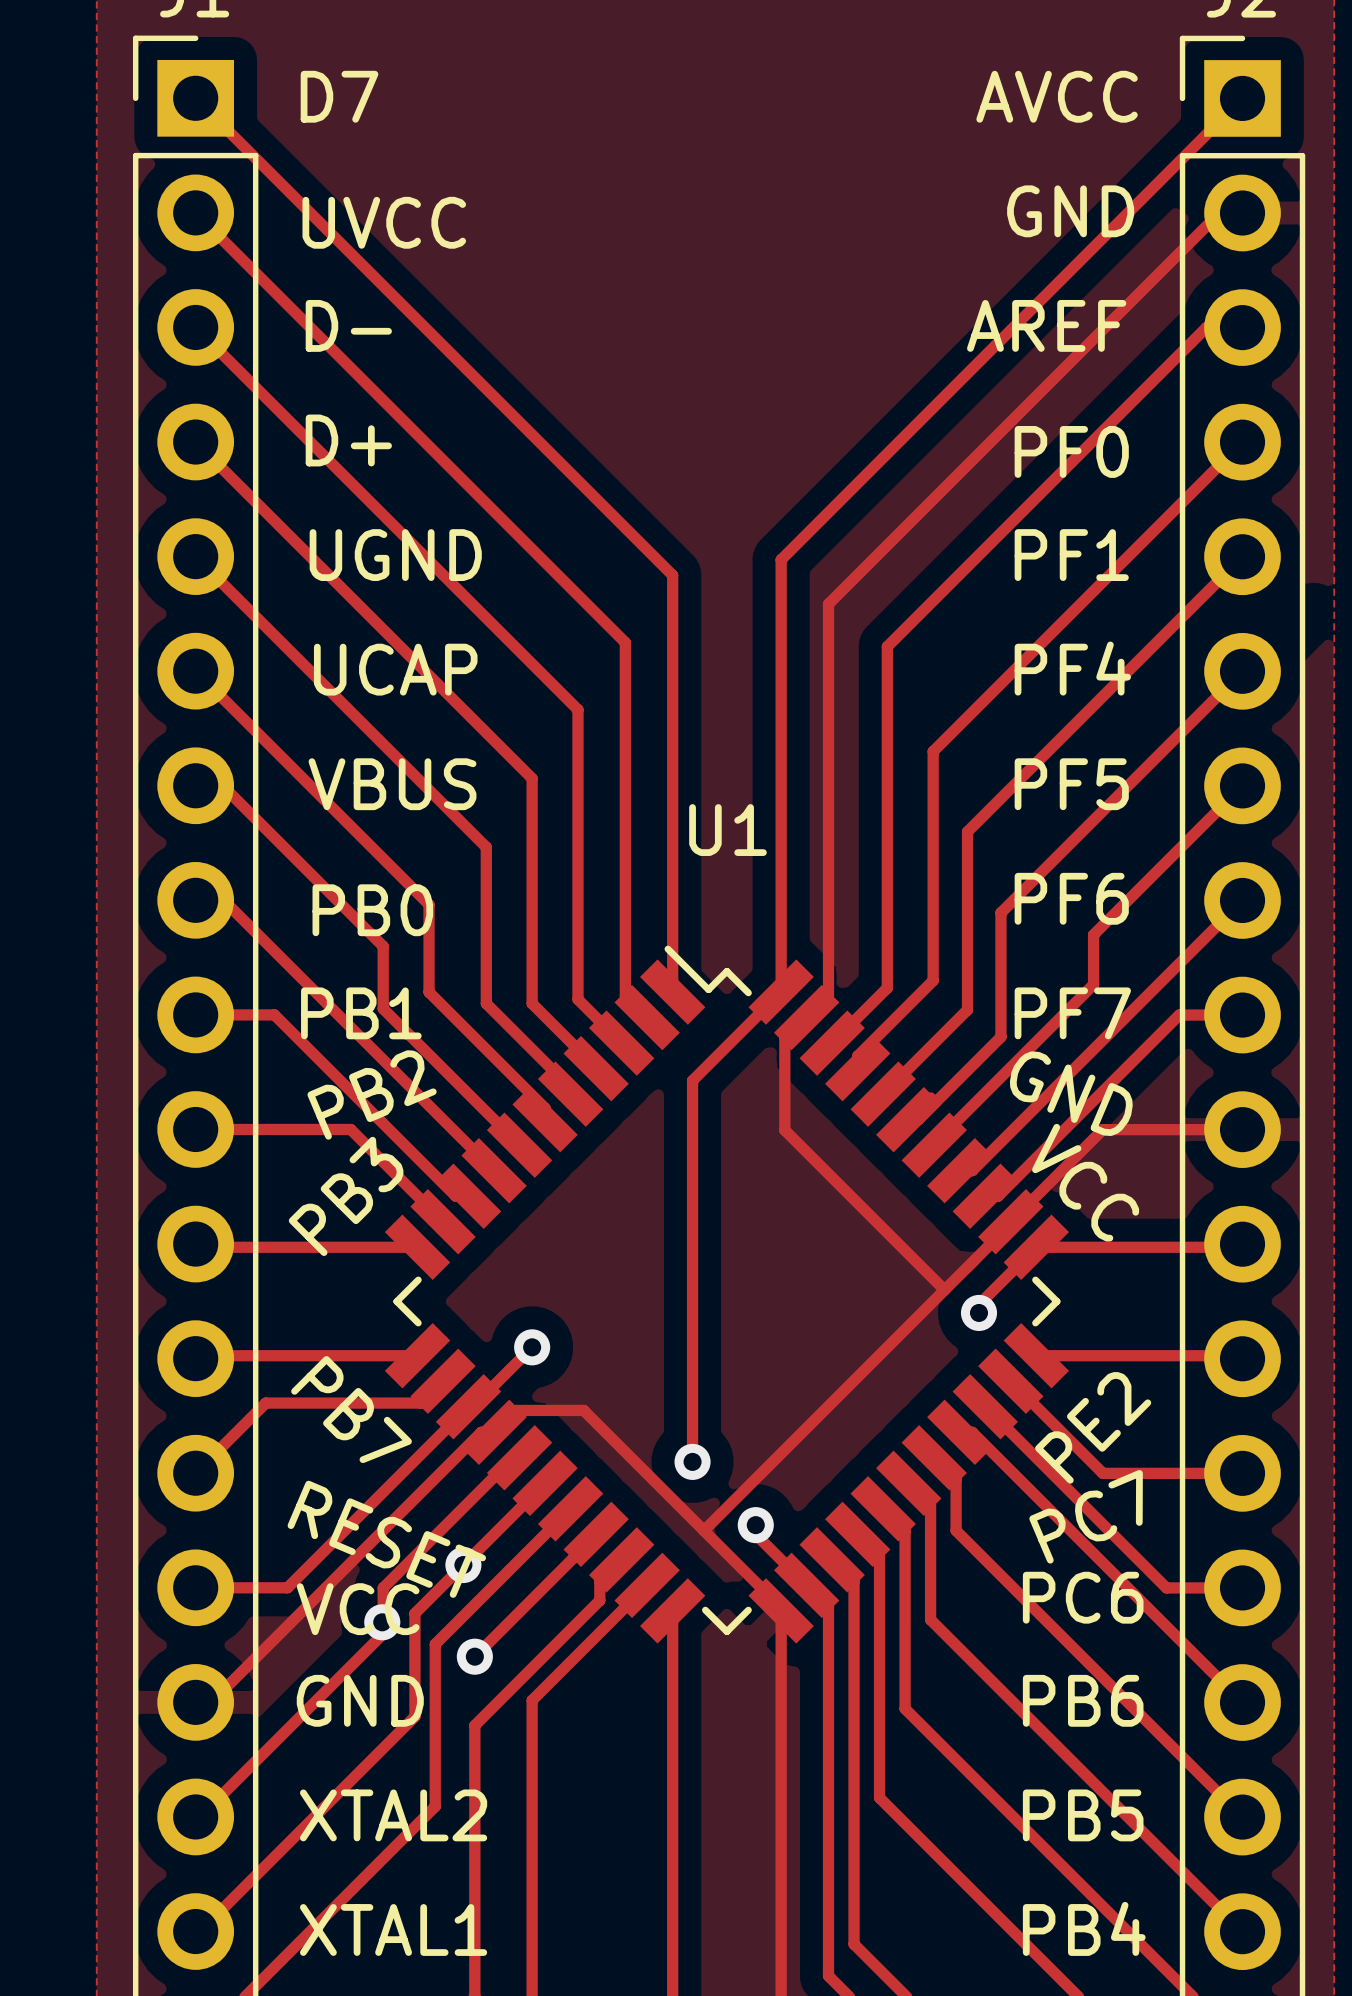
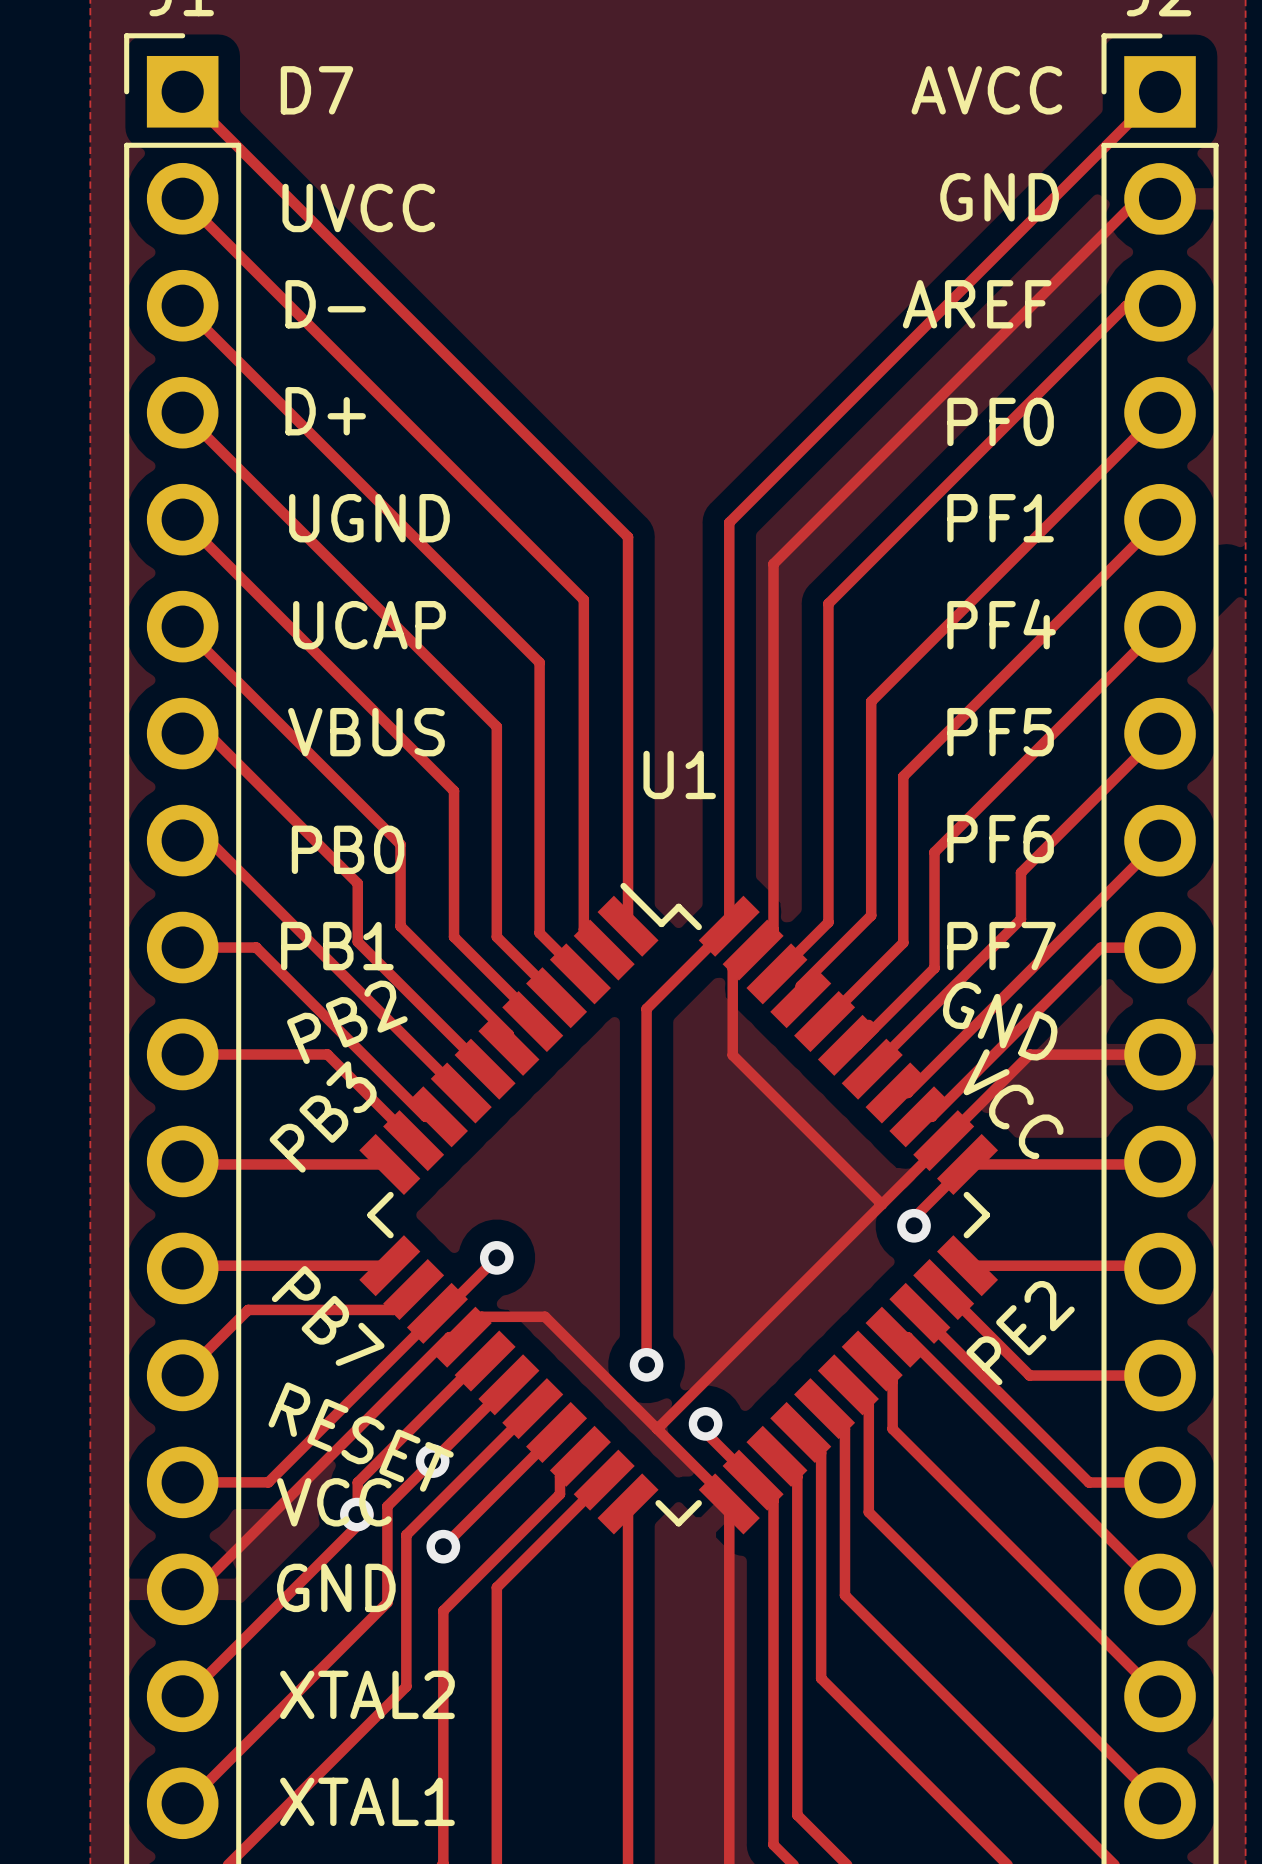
text: PC7 (1086, 1516) -> none
text: PC6 (1083, 1597) -> none
text: PB6 (1083, 1700) -> none
text: PB5 (1083, 1815) -> none
text: PB4 (1084, 1928) -> none

